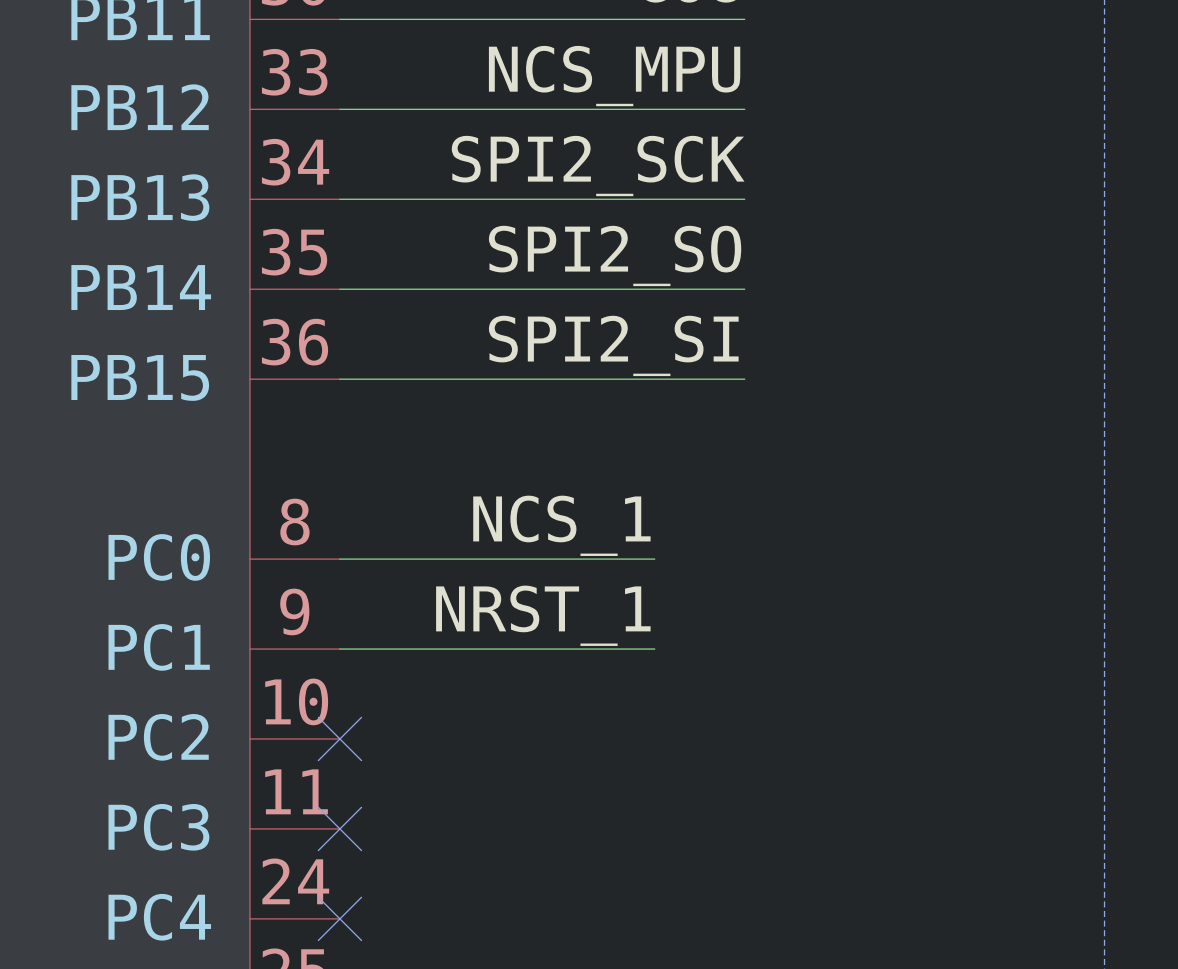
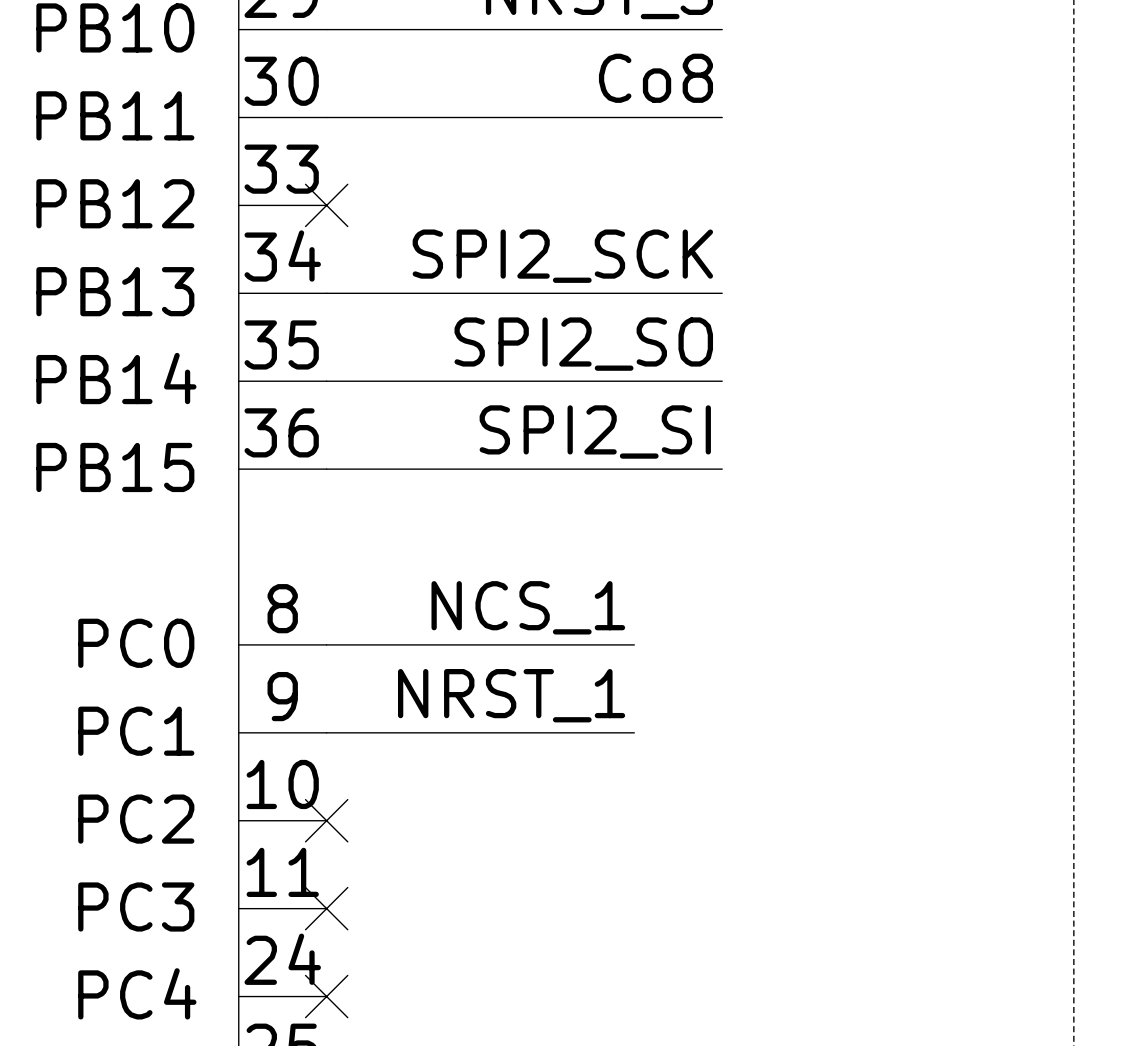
label: NCS_MPU (614, 76) -> none
wire: (339, 109) (744, 109) -> none
no-connect mark: none -> (326, 205)

